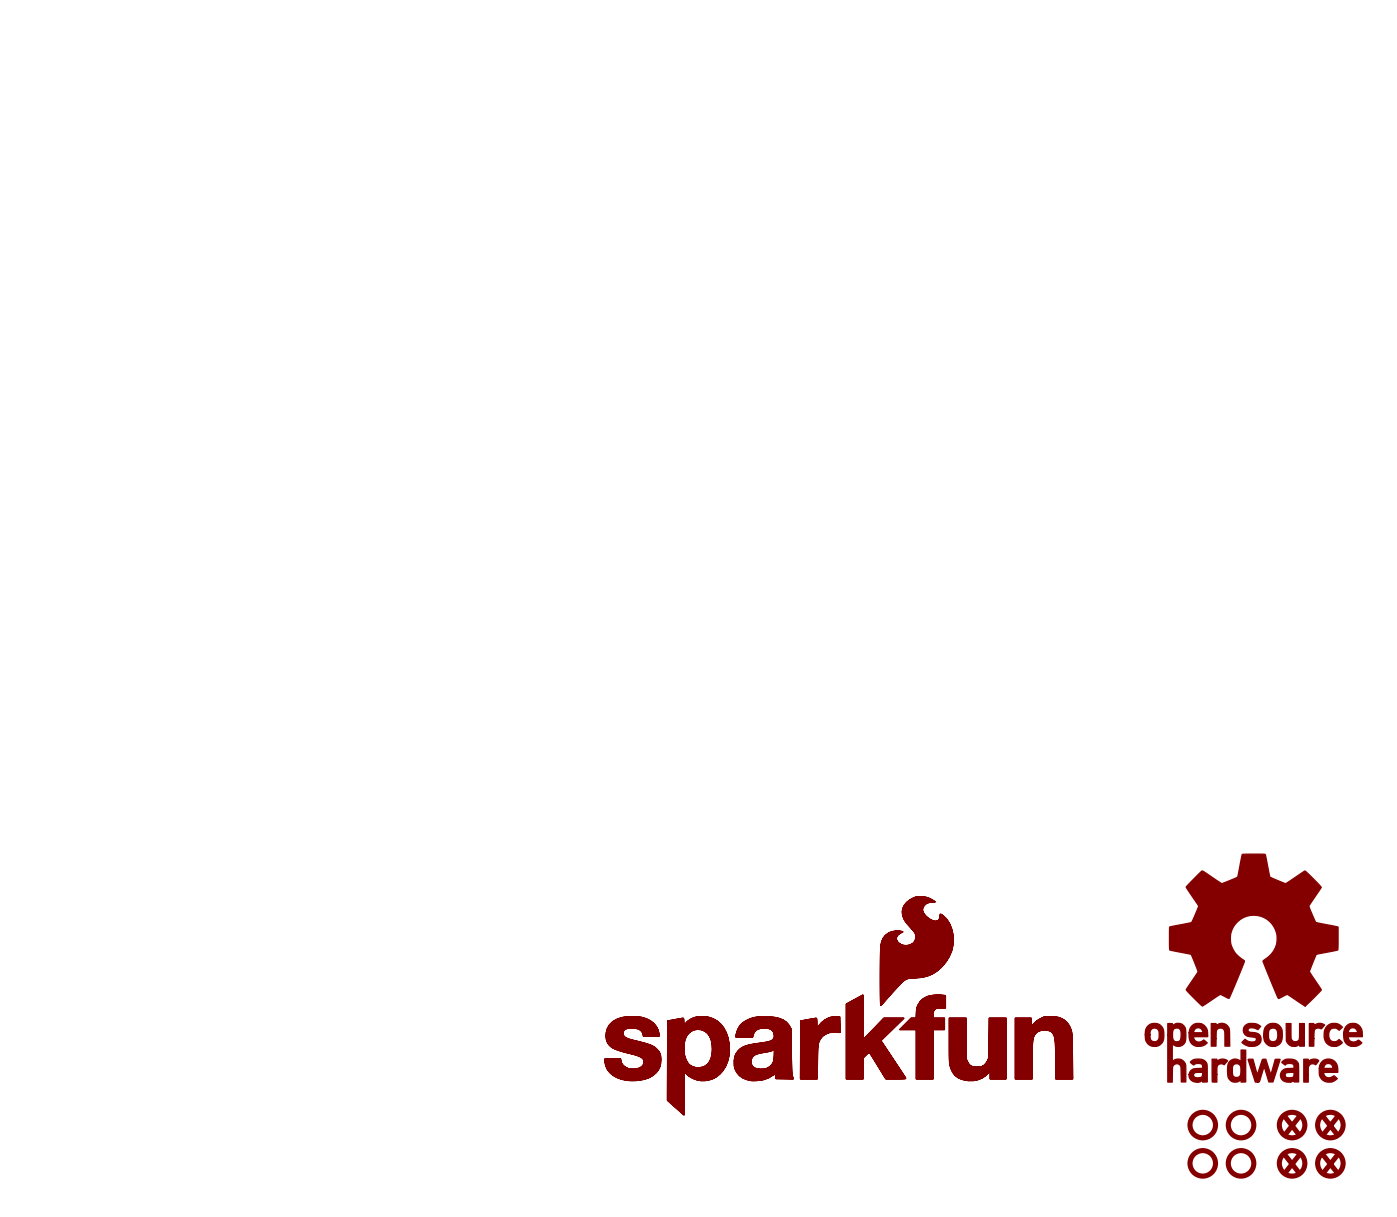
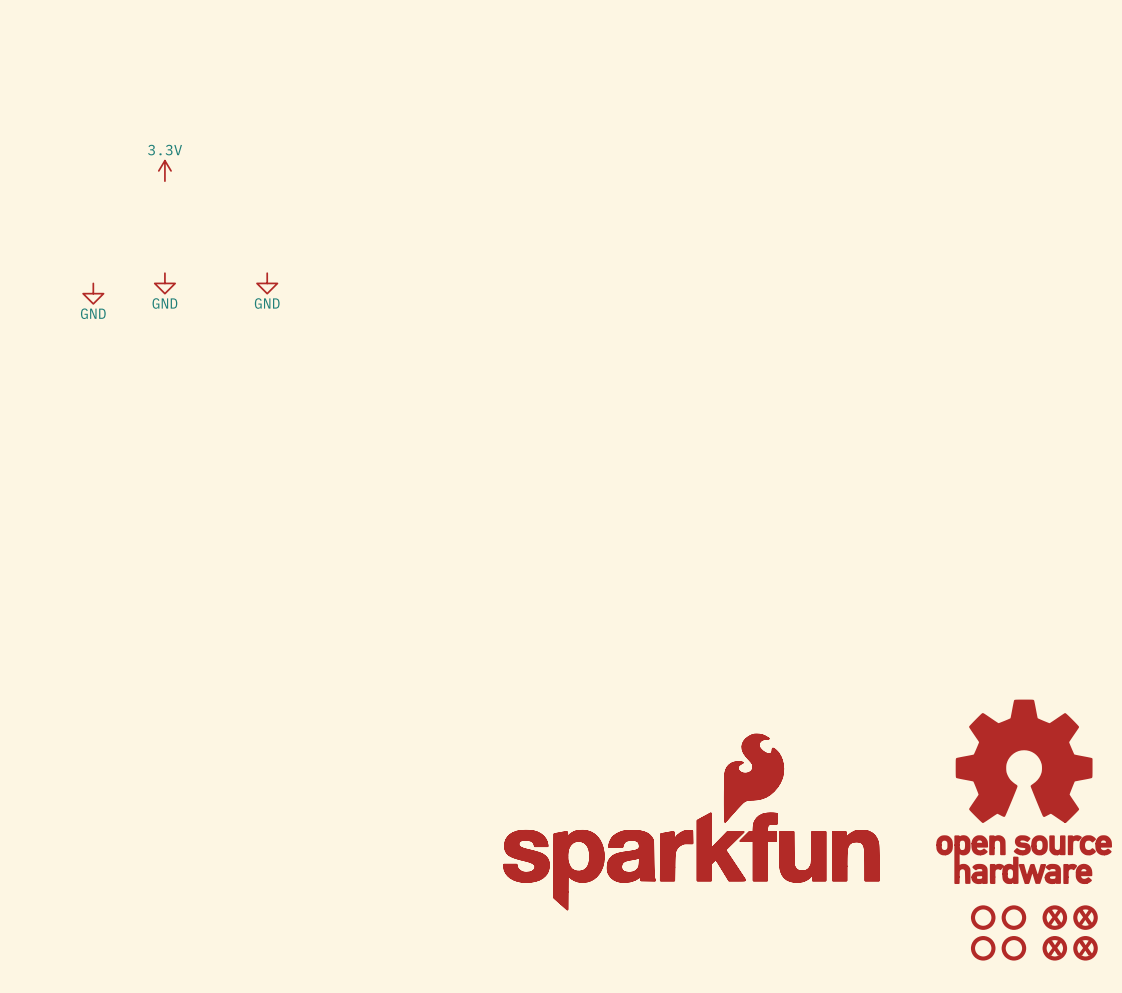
power symbol: none -> 3.3V (164, 170)
power symbol: none -> GND (164, 283)
power symbol: none -> GND (267, 283)
power symbol: none -> GND (93, 293)

